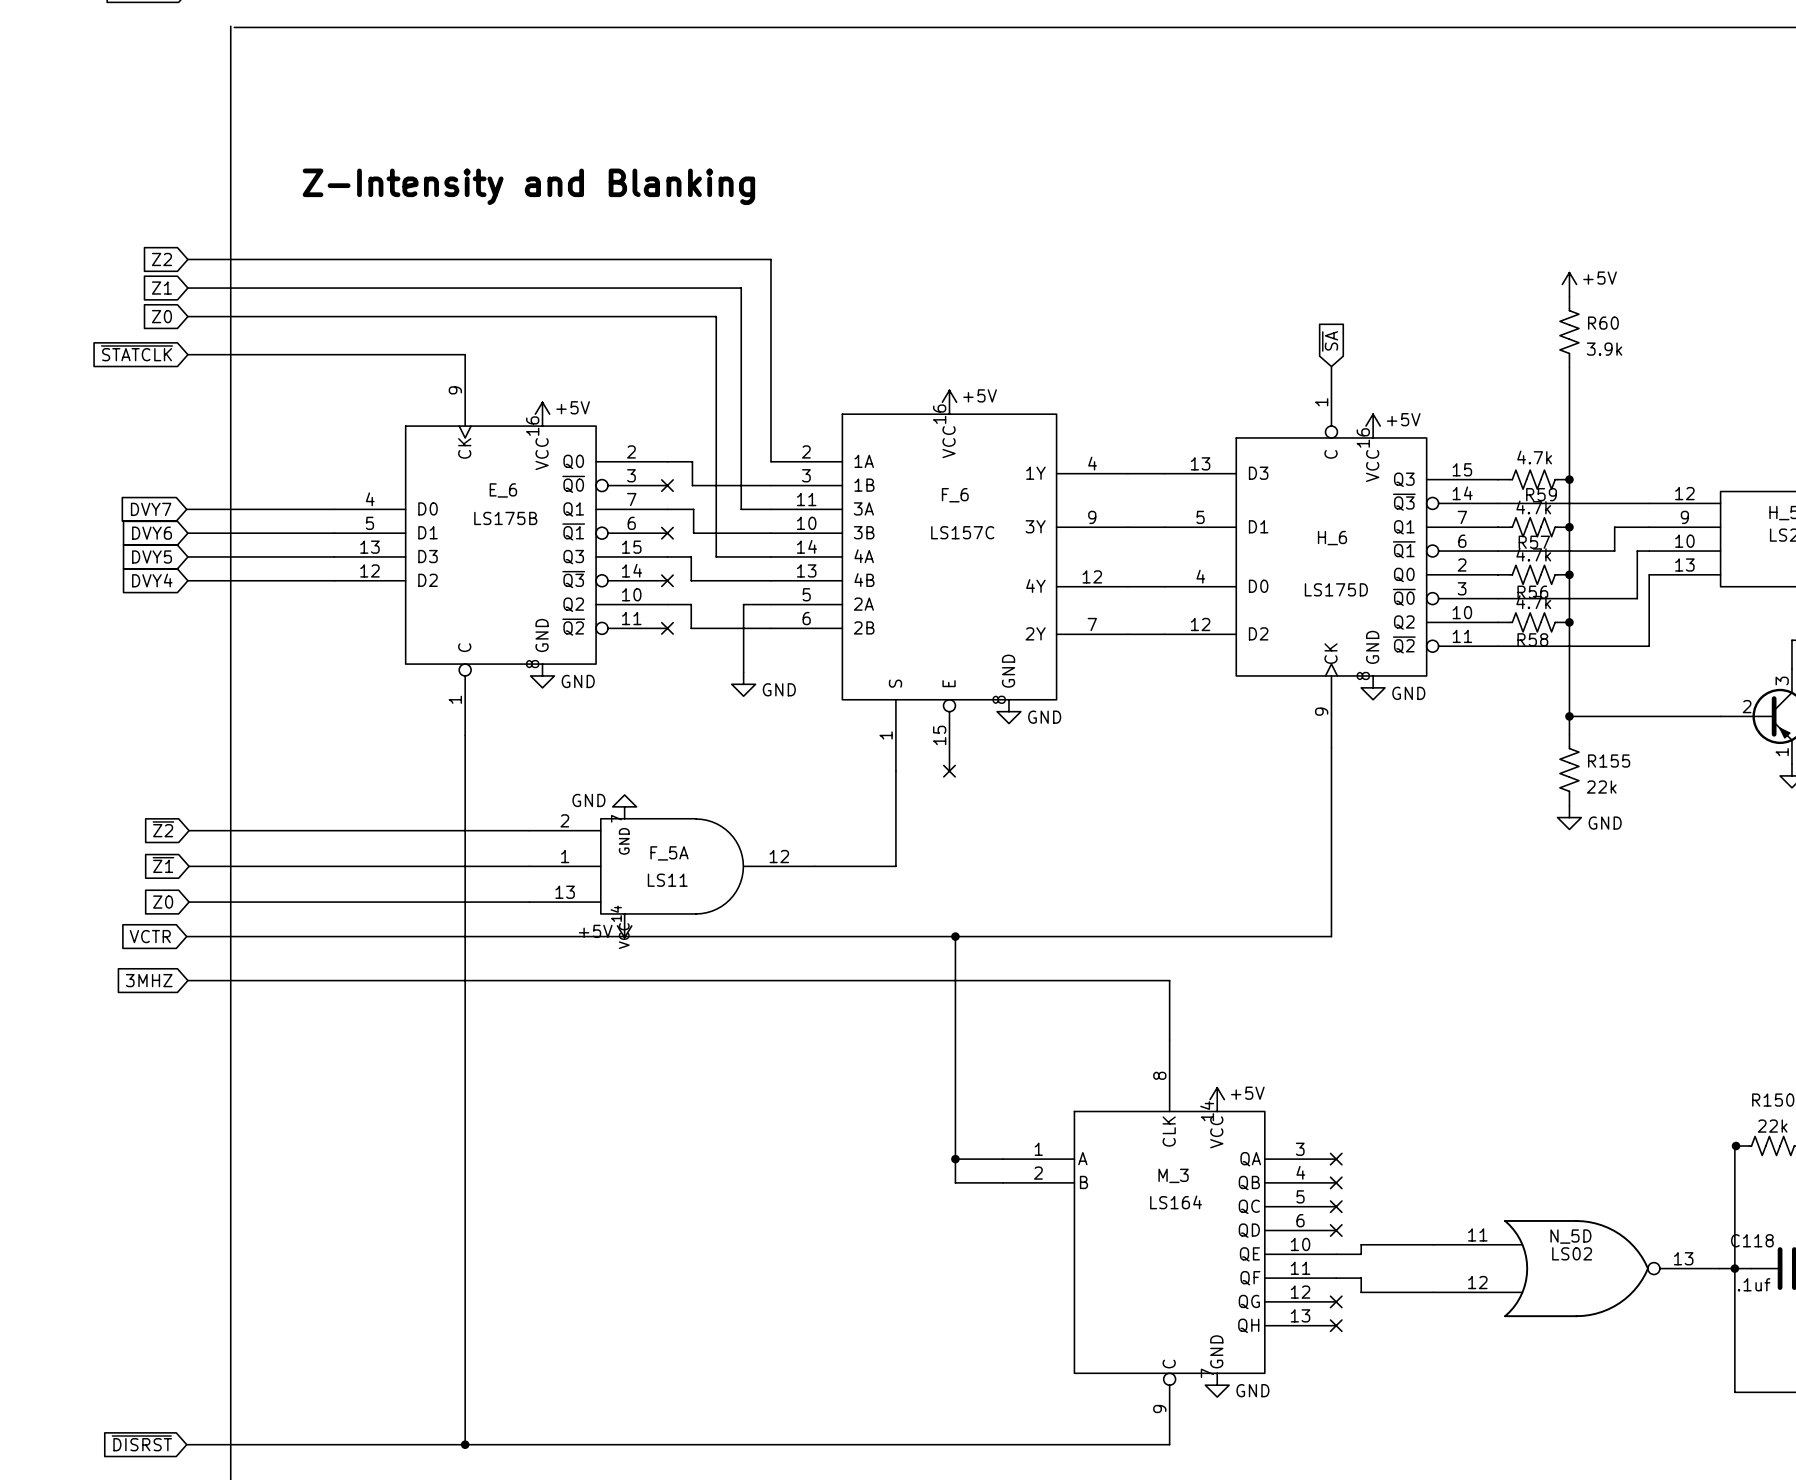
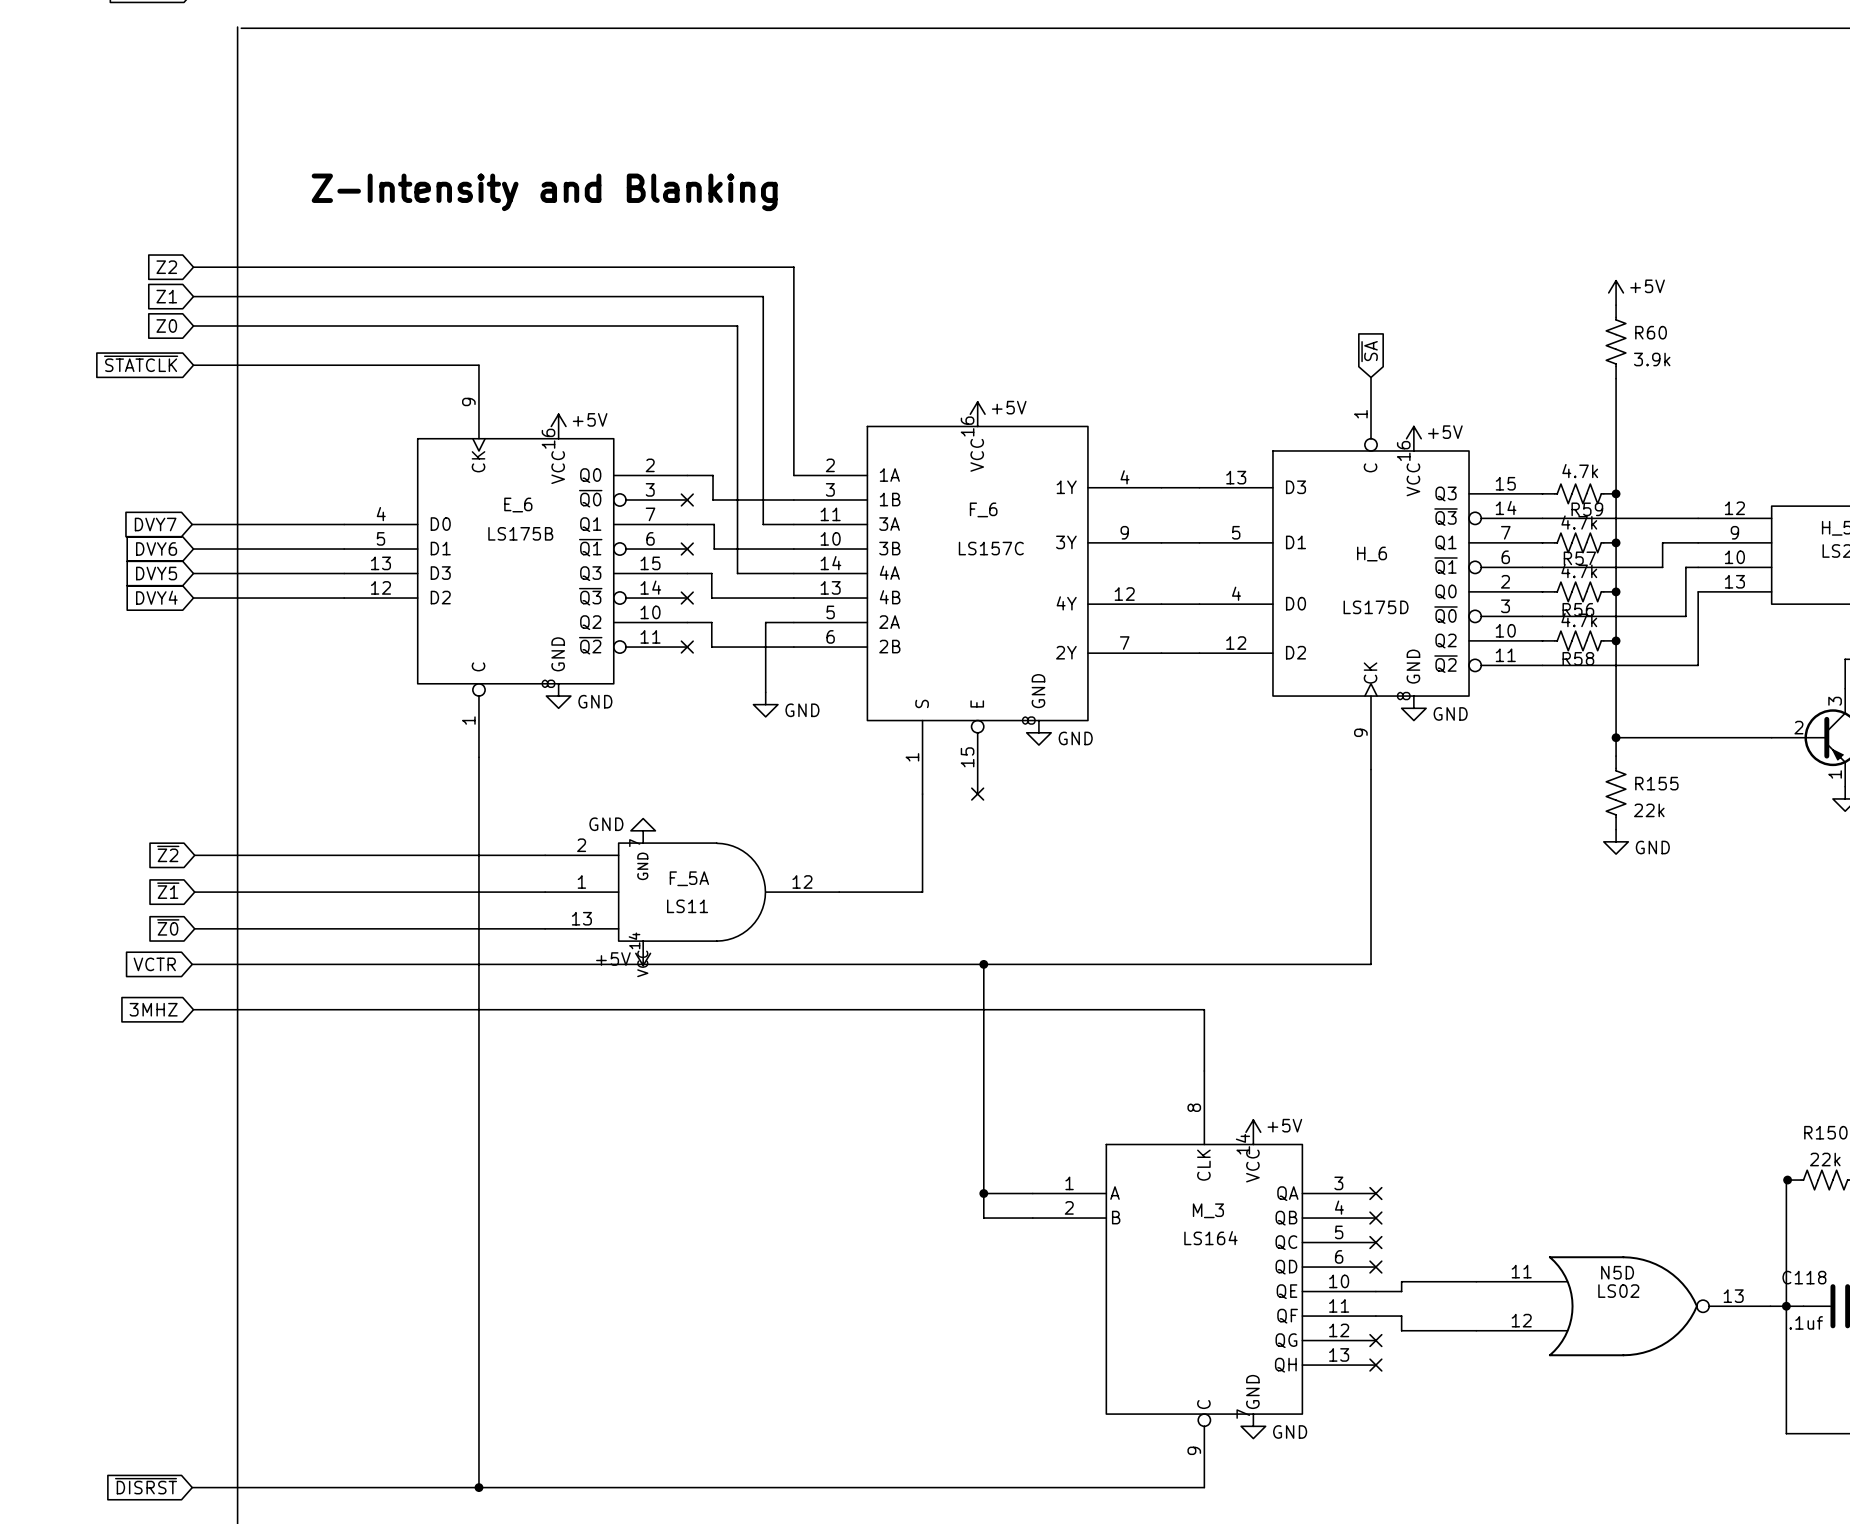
global label: Z0 (163, 902) -> ~{Z0} (168, 927)
N_5D name: N_5D (1570, 1236) -> N5D (1617, 1272)

